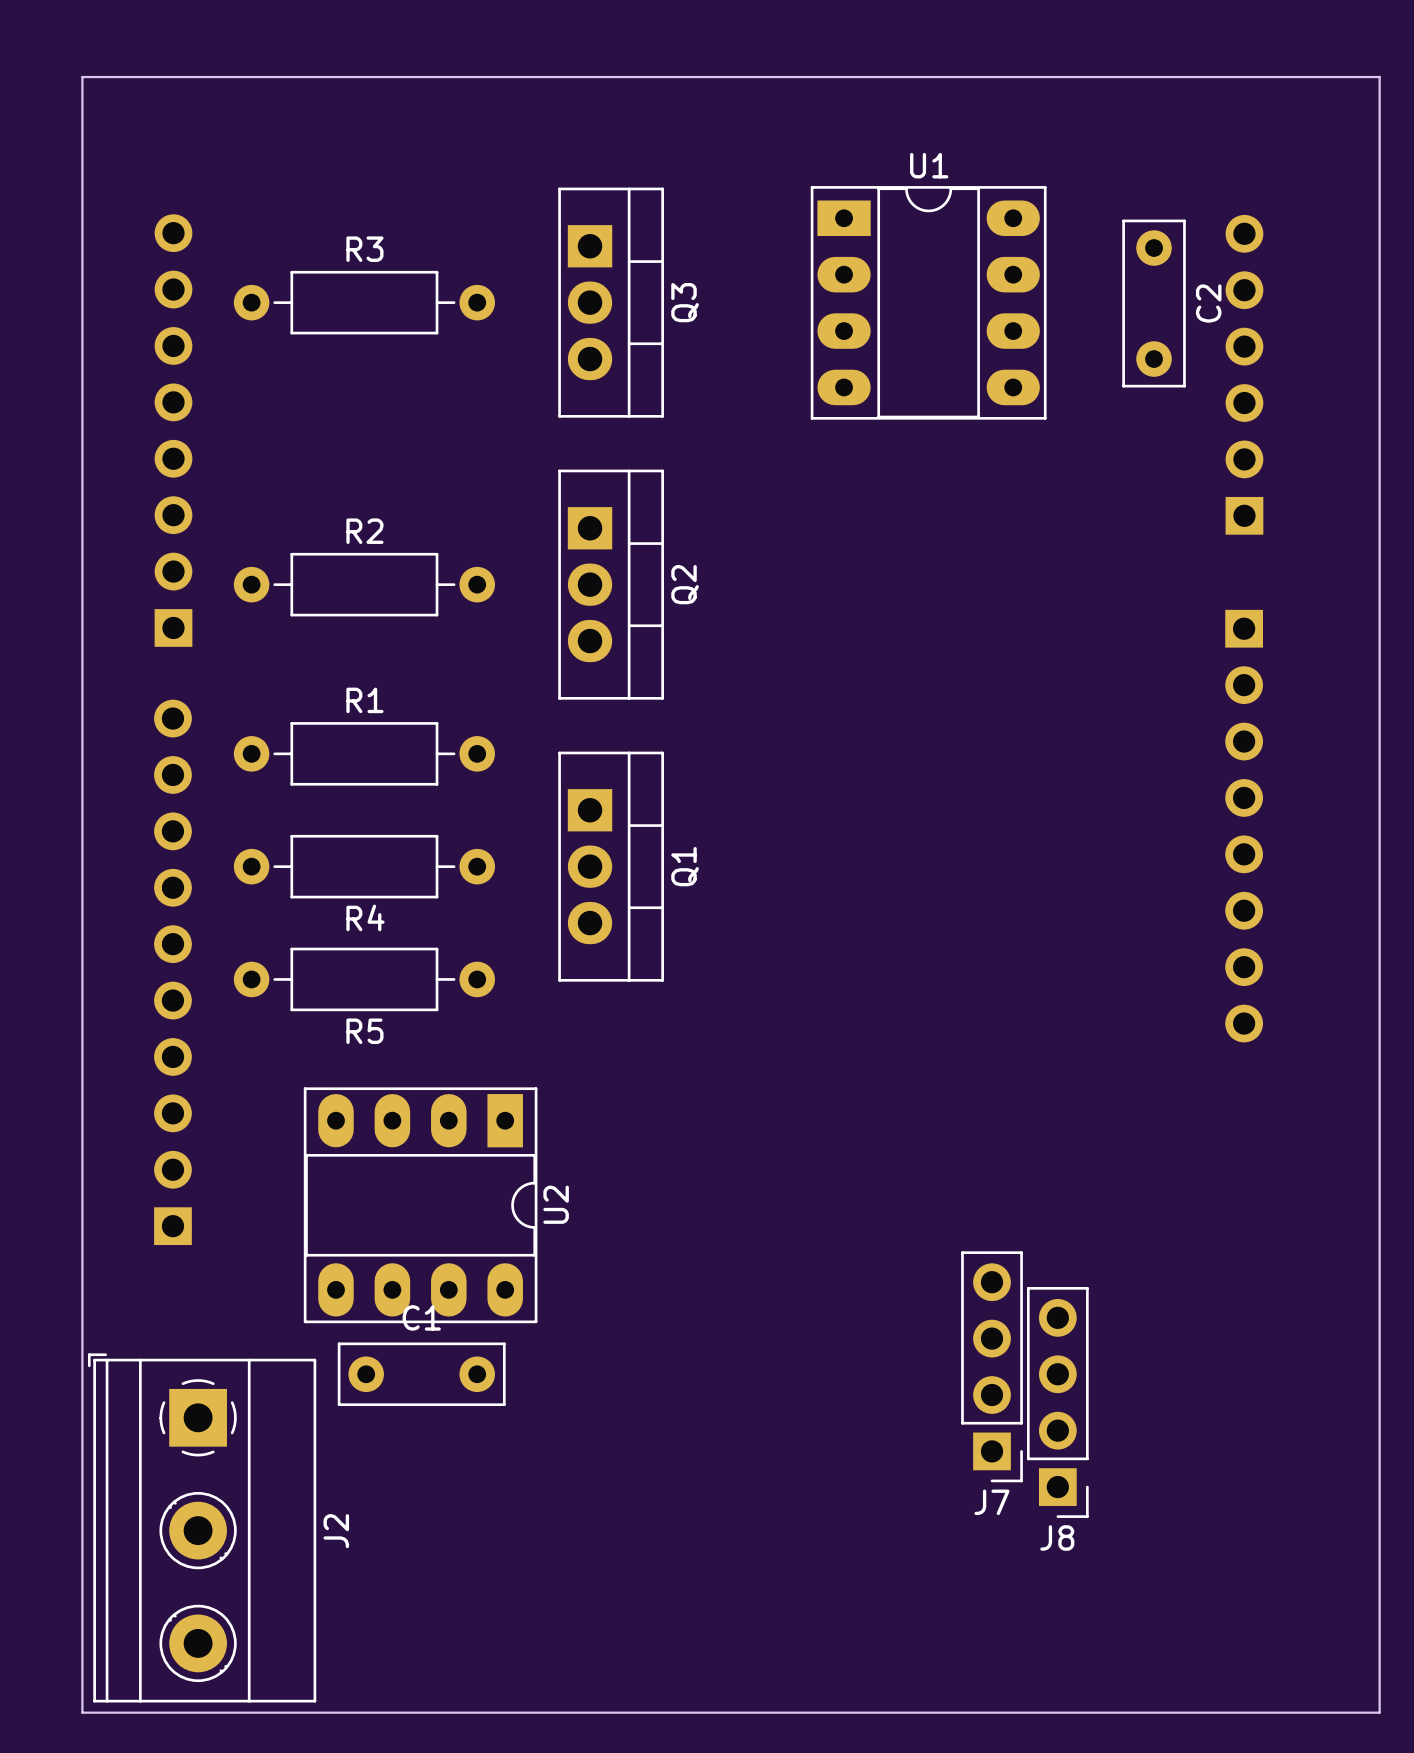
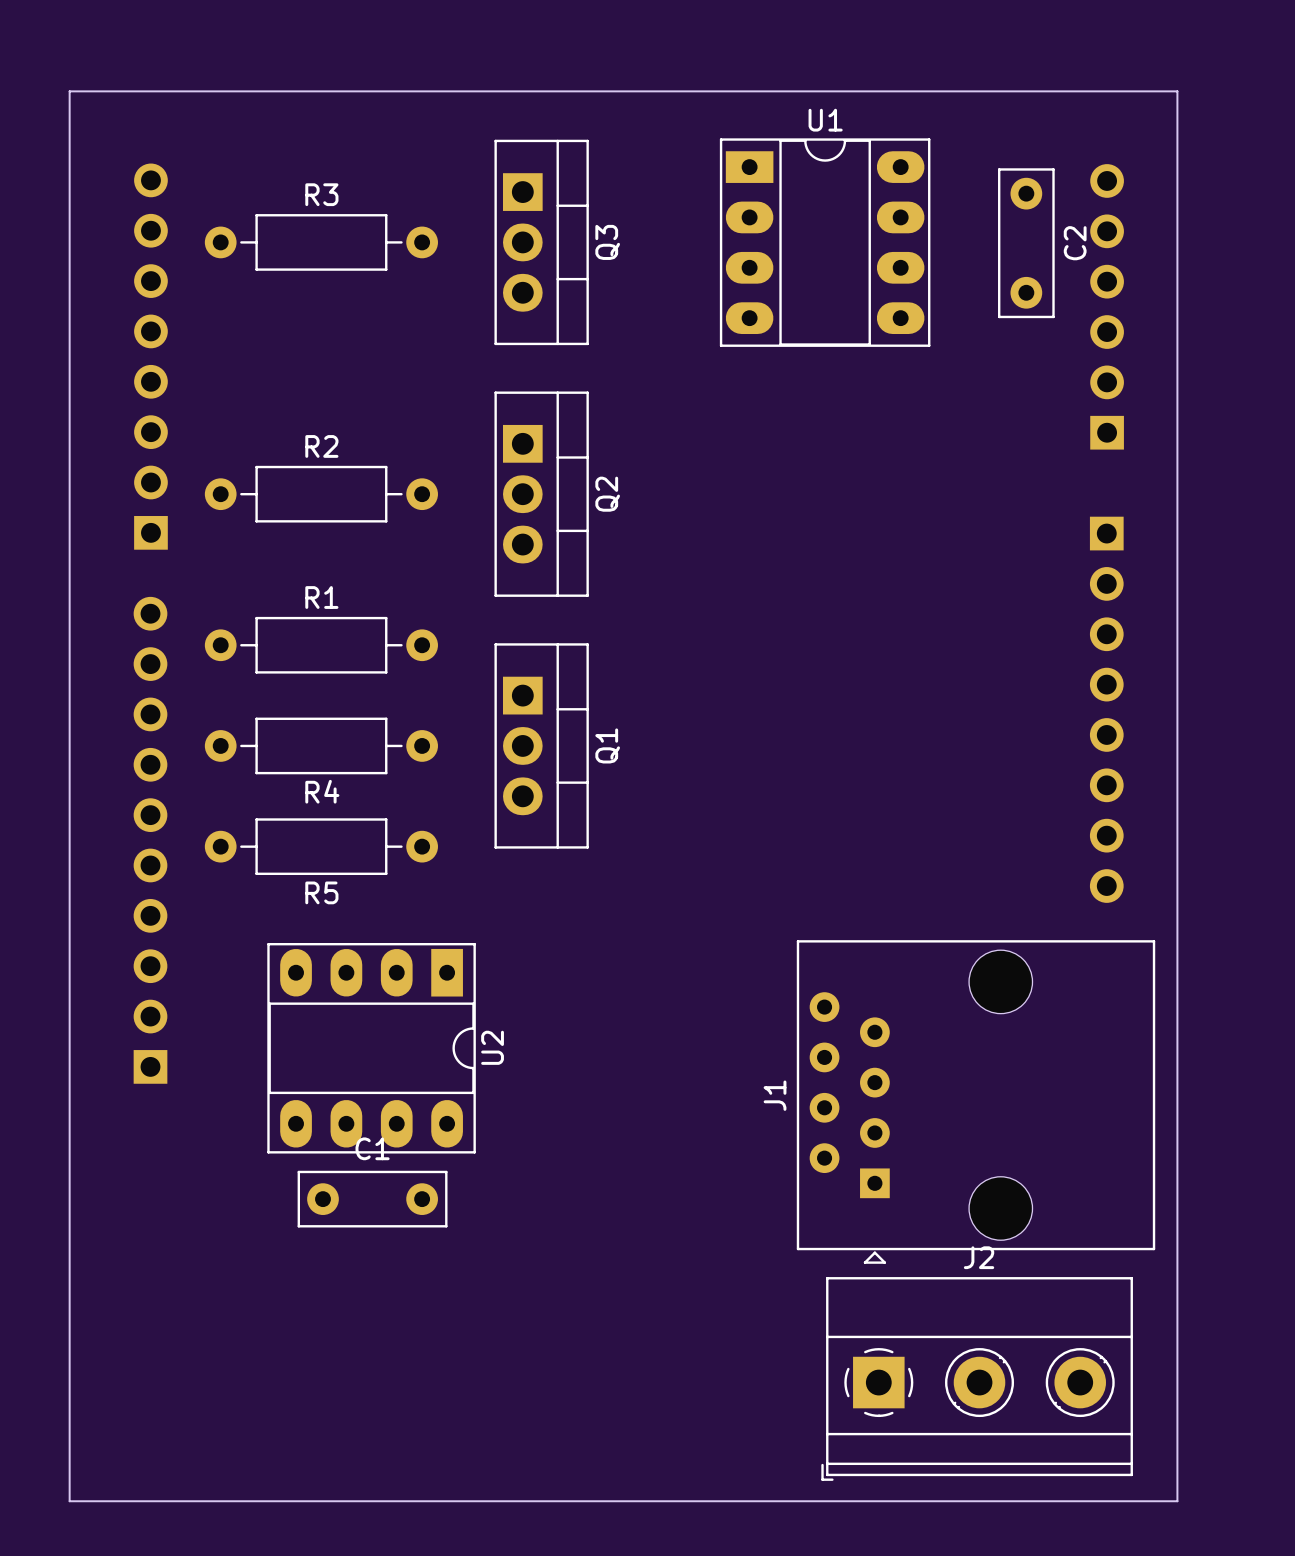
board edge: (82, 133) (82, 77) (1379, 77) (1379, 1712) (1323, 1712) -> (69, 91) (1177, 91) (1177, 1501)
J1: none -> (976, 1101)
J7: (992, 1366) -> none
J8: (1057, 1402) -> none
J2 rotation: 0° (202, 1527) -> 90° counterclockwise (977, 1378)
J2 position: (202, 1527) -> (977, 1378)

